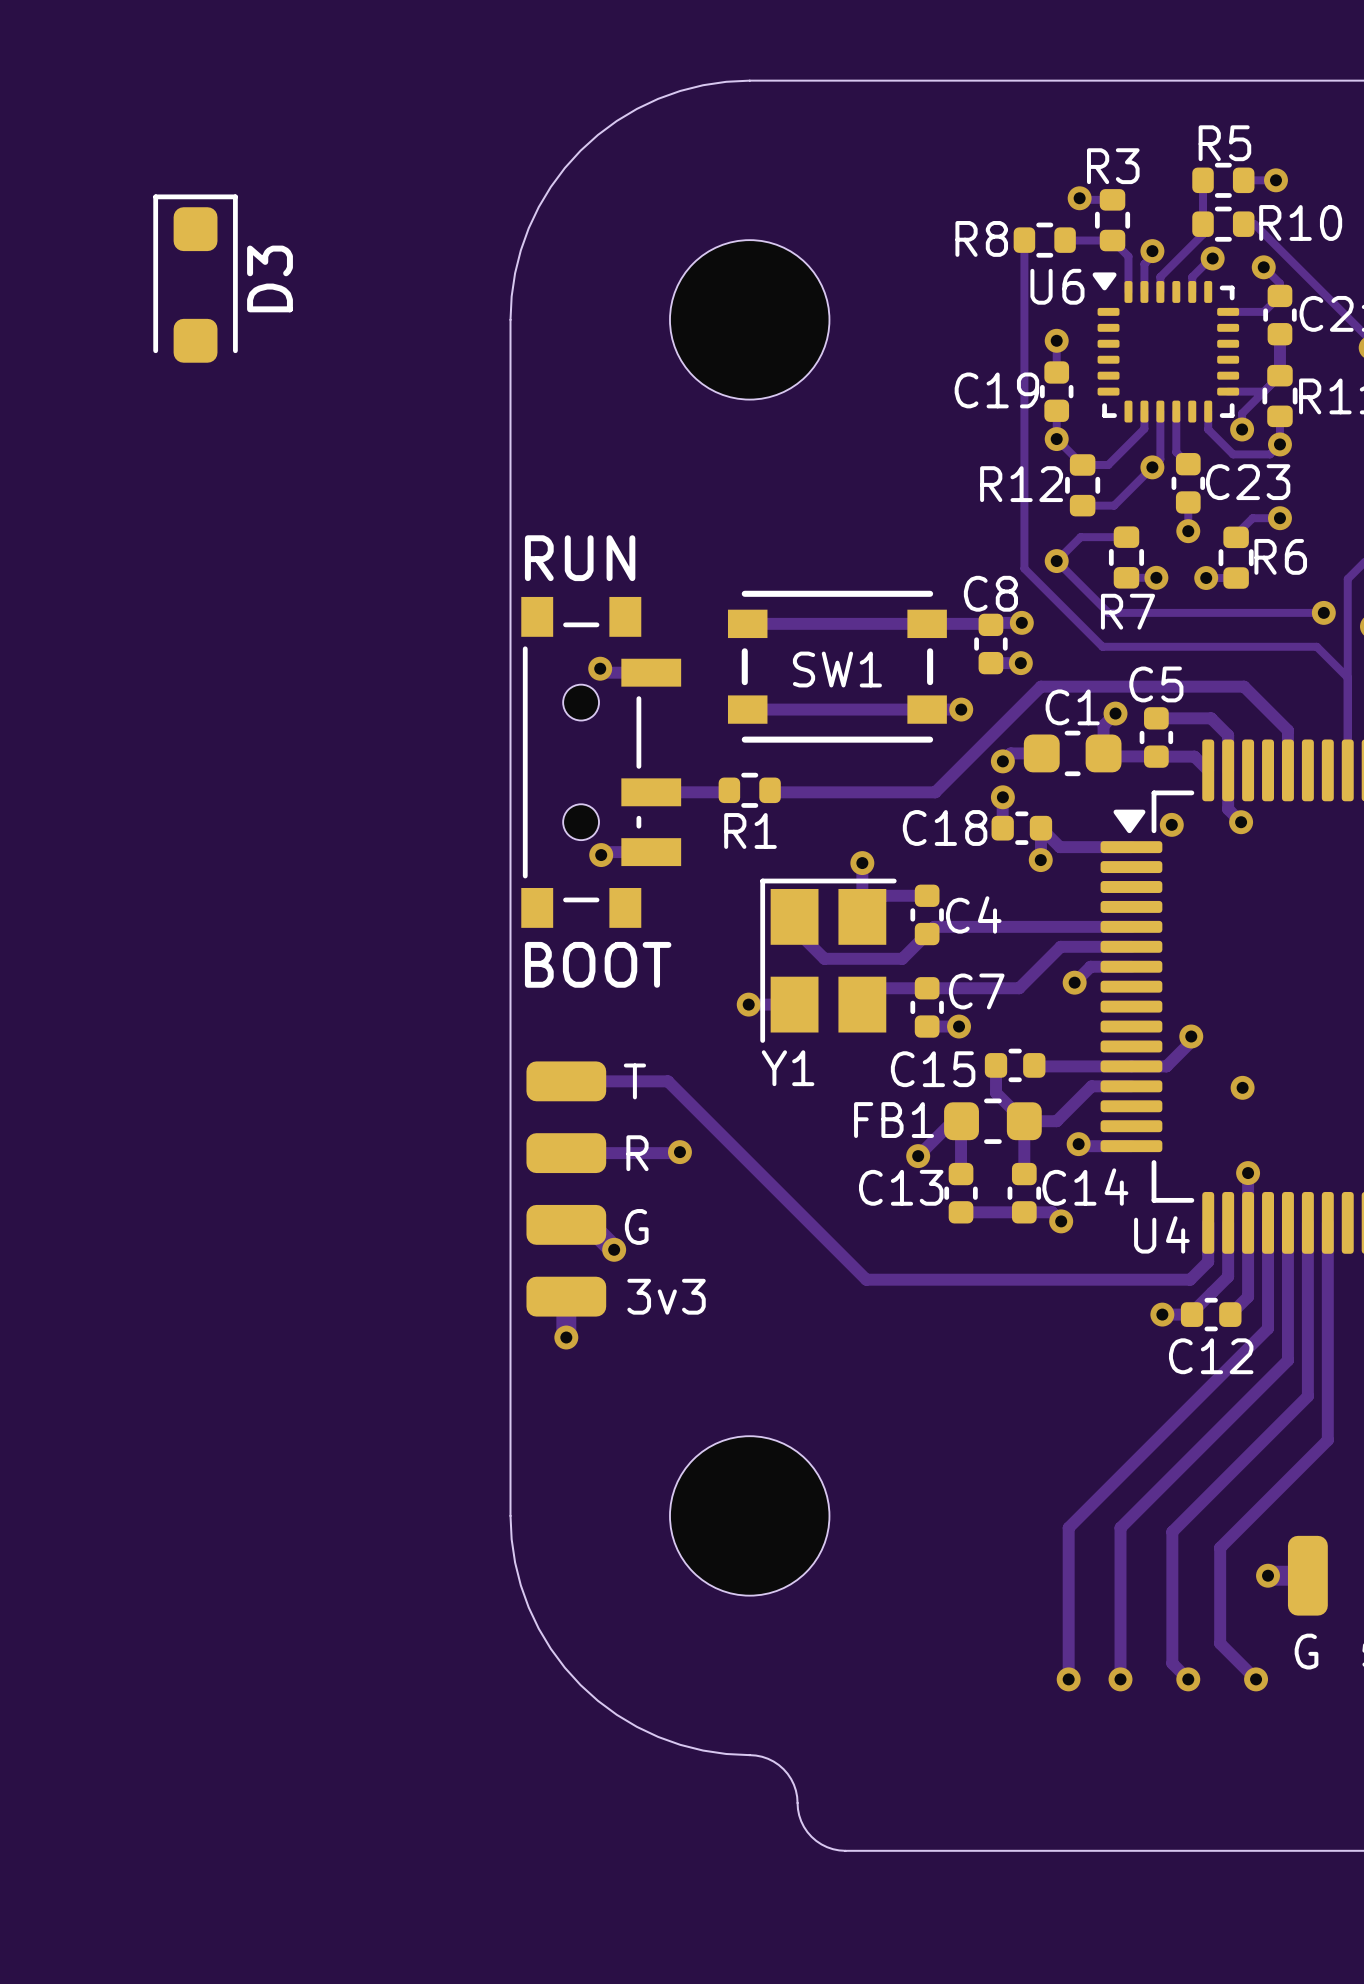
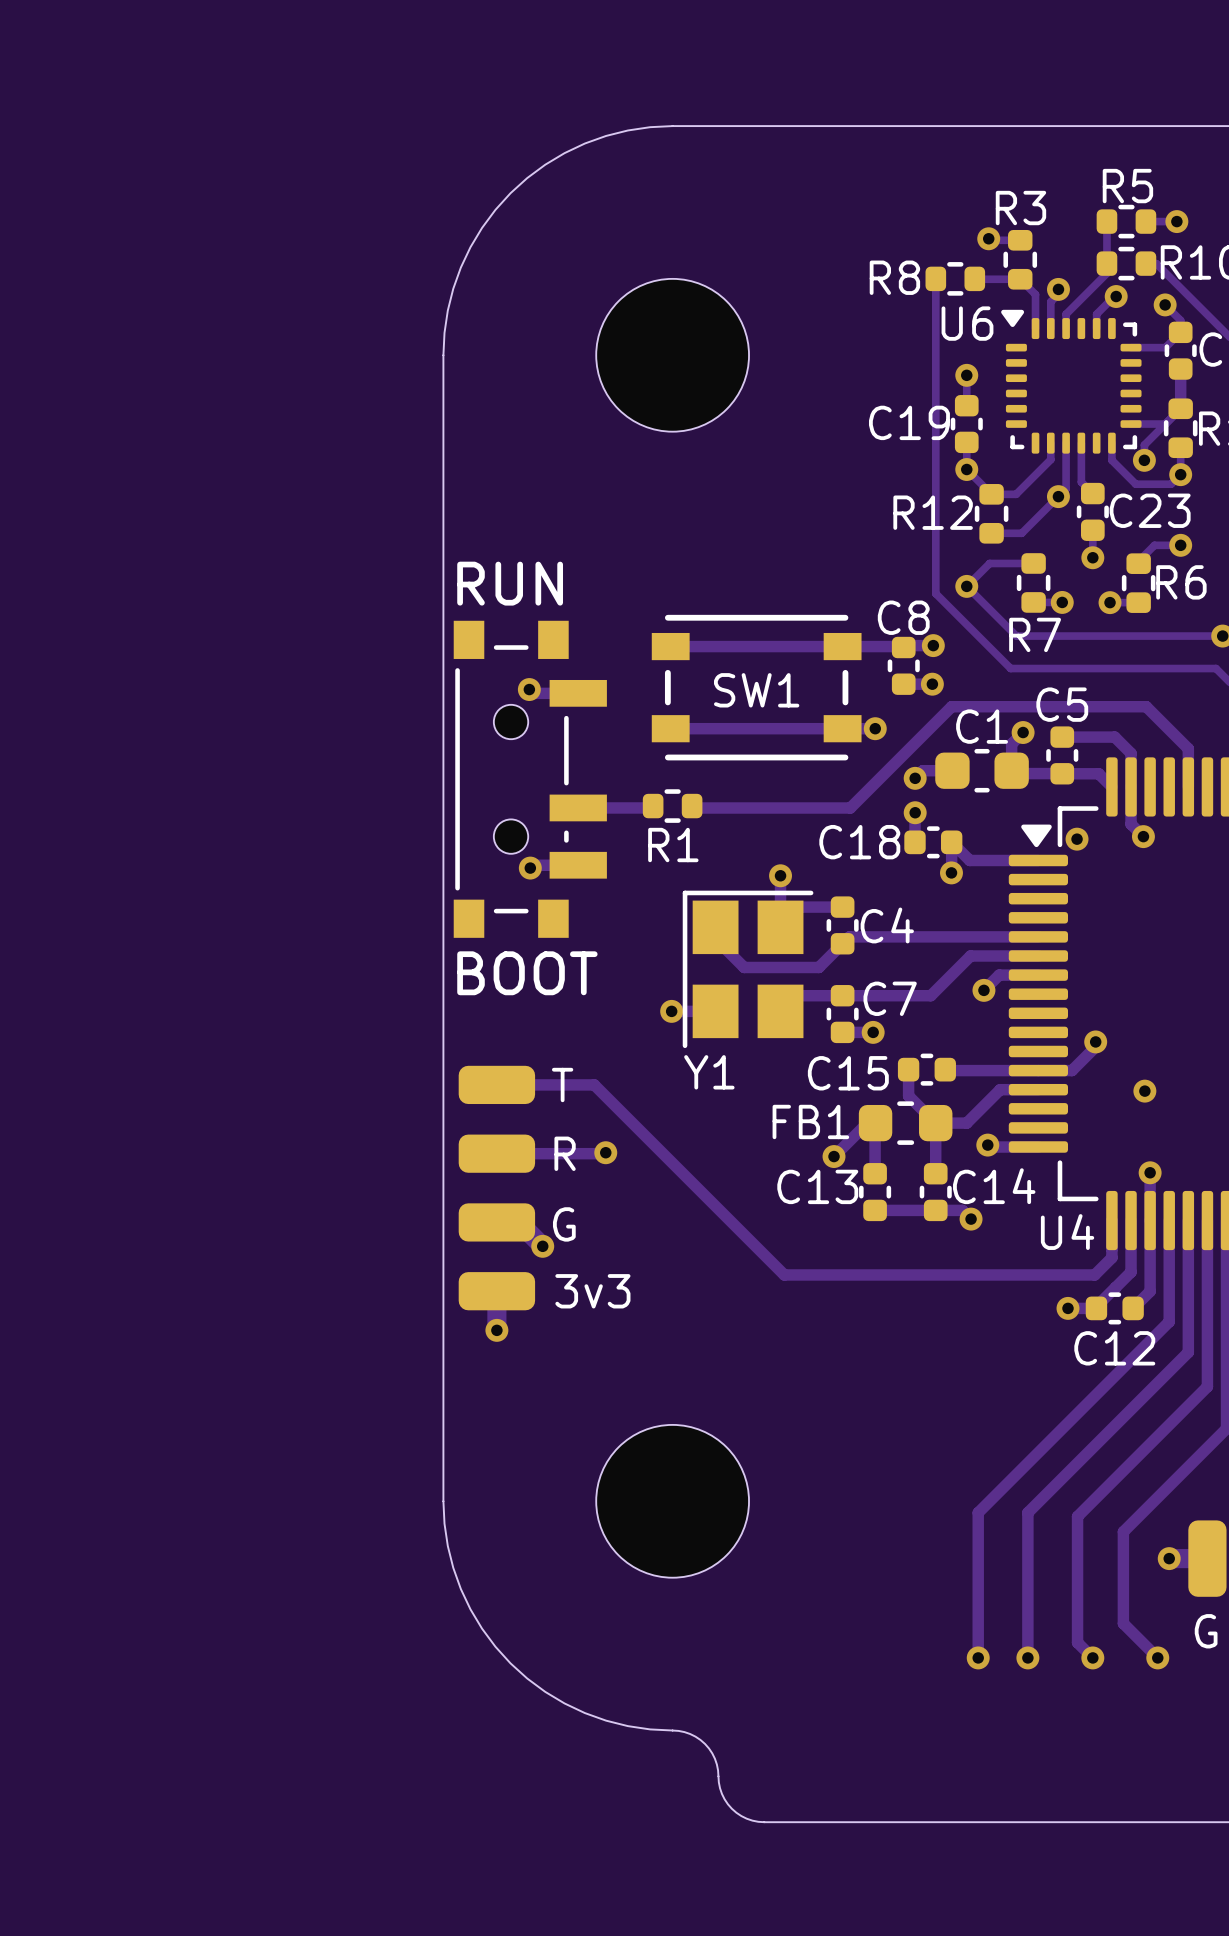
D3: (195, 278) -> none

